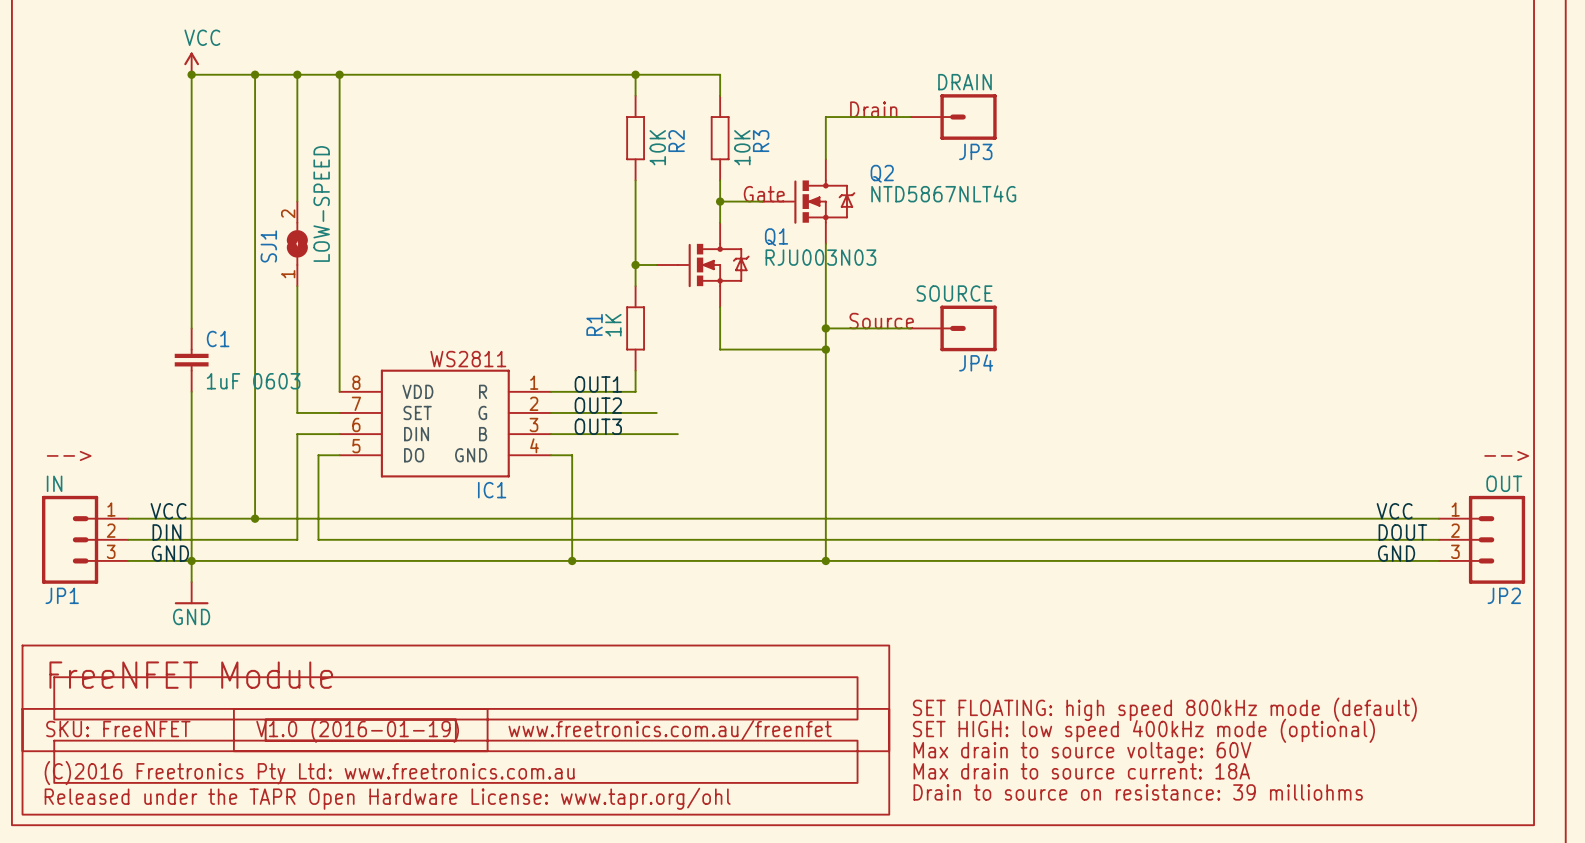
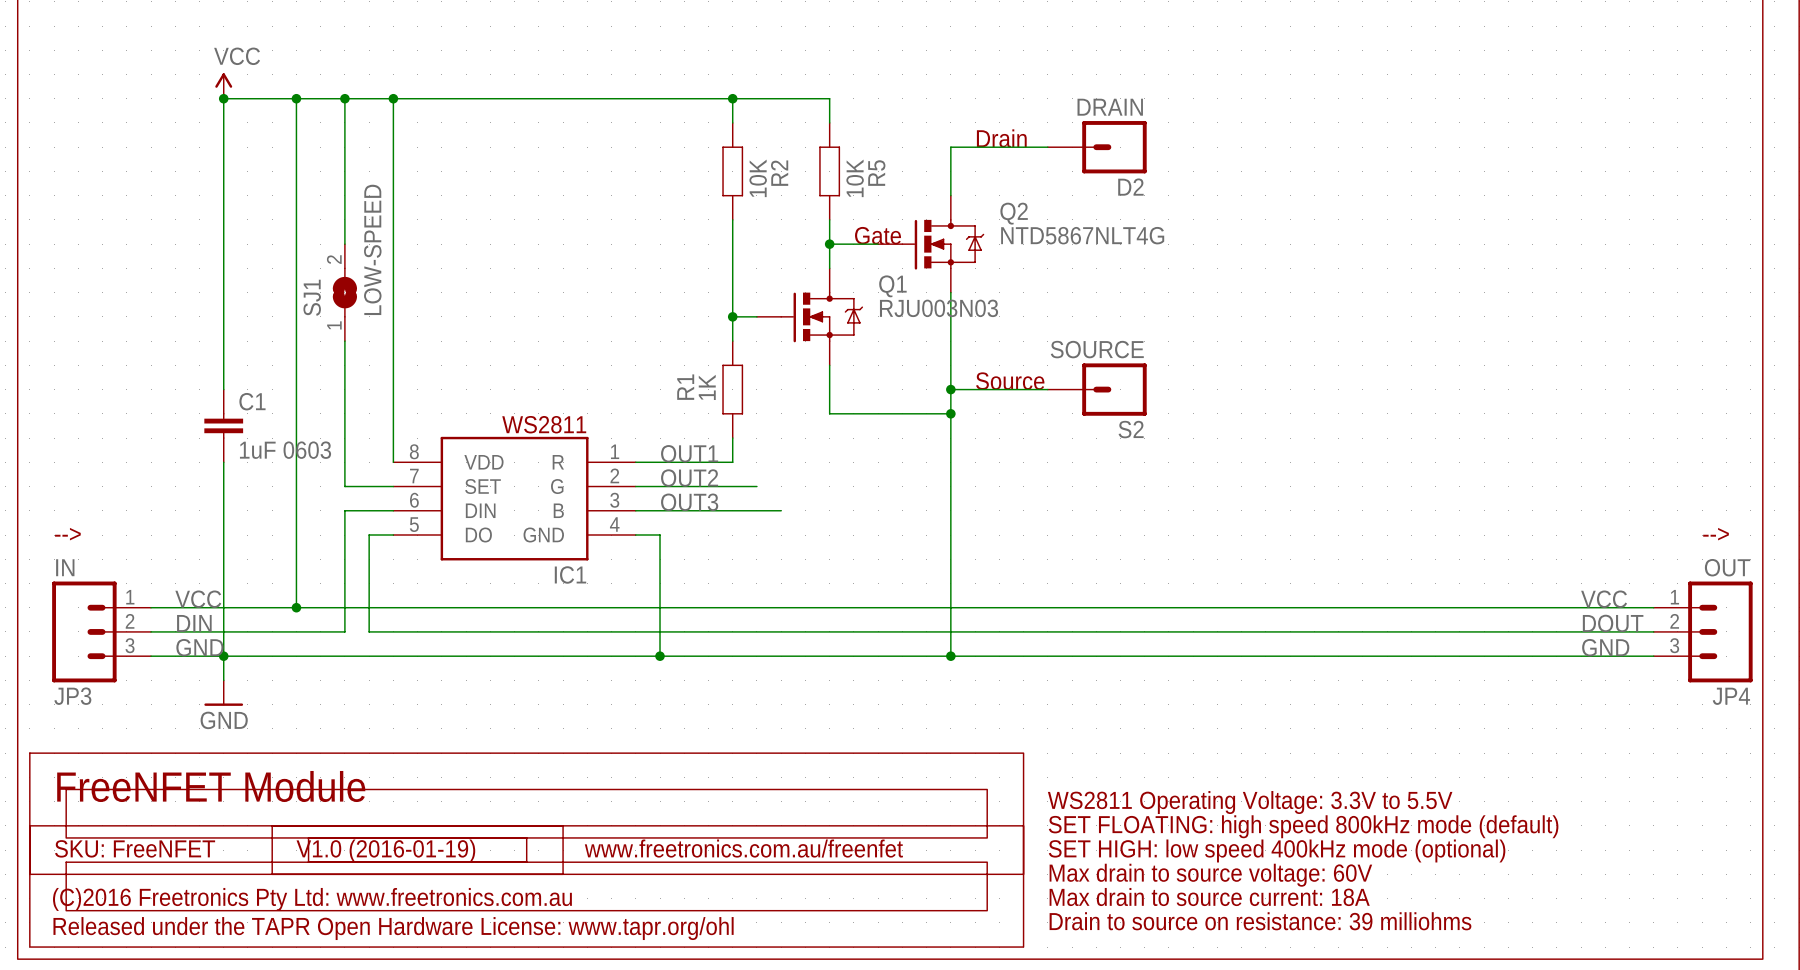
R3 name: R3 (761, 141) -> R5 (876, 173)
JP3 name: JP3 (975, 151) -> D2 (1130, 187)
JP4 name: JP4 (976, 362) -> S2 (1131, 429)
JP1 name: JP1 (62, 595) -> JP3 (72, 696)
JP2 name: JP2 (1504, 595) -> JP4 (1731, 696)
text: none -> WS2811 Operating Voltage: 3.3V to 5.5V (1250, 802)

